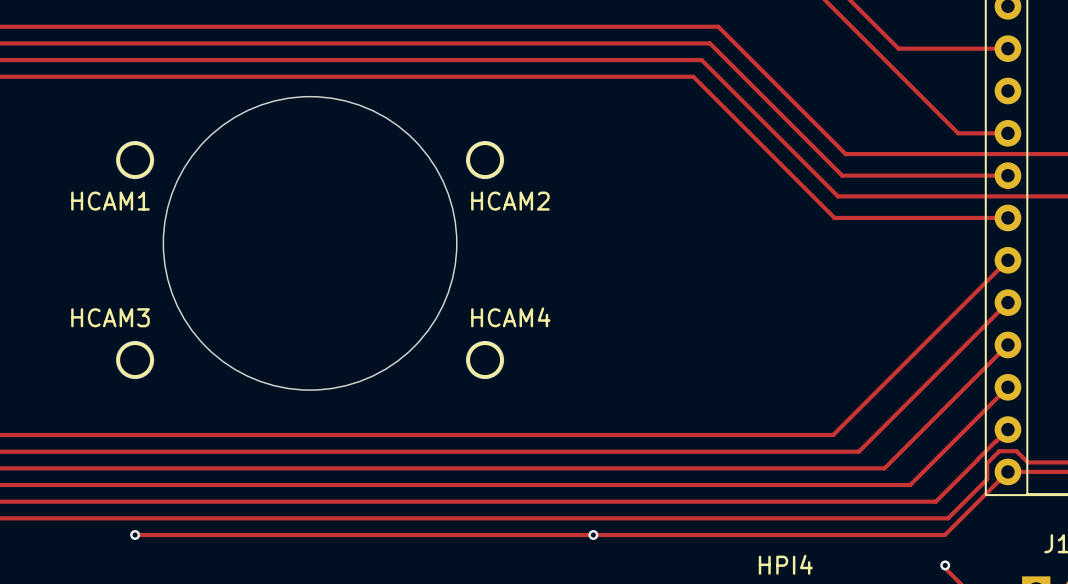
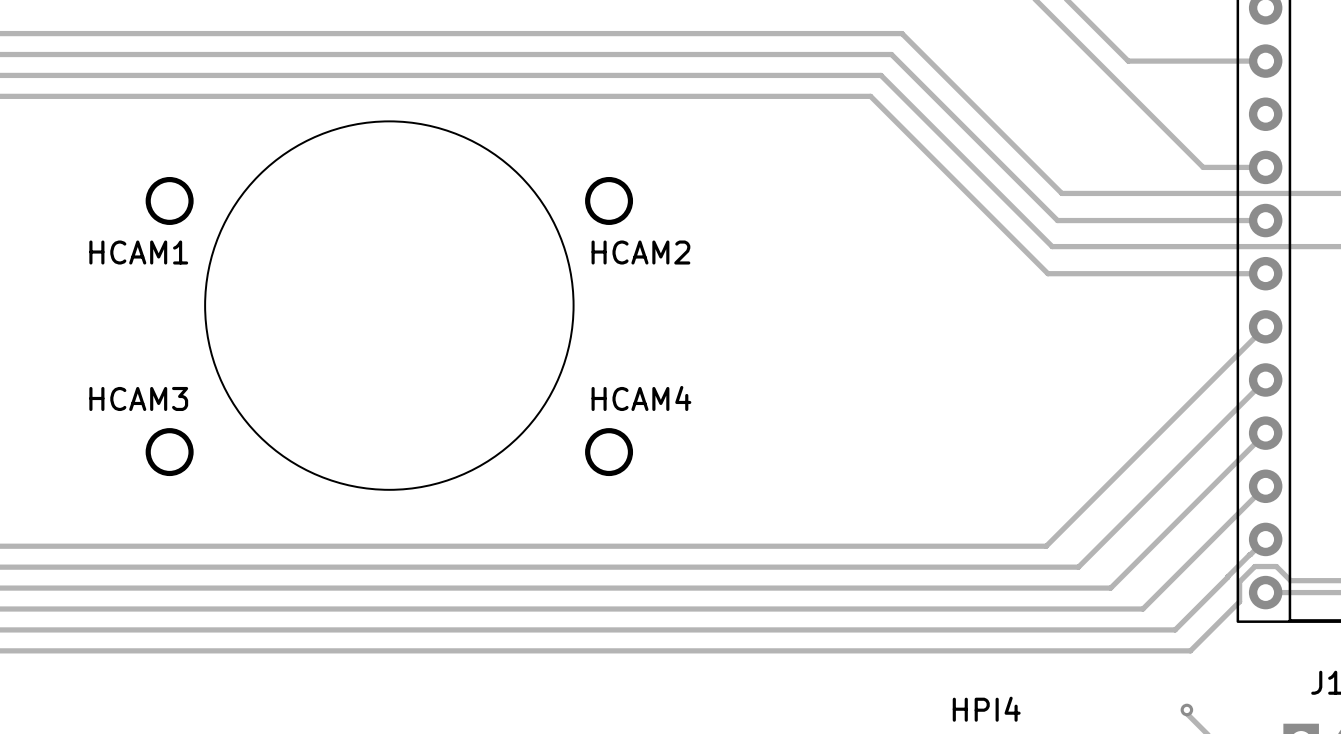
track: (1007, 471) (944, 535) (135, 535) -> none
via: (135, 535) -> none
via: (593, 535) -> none

